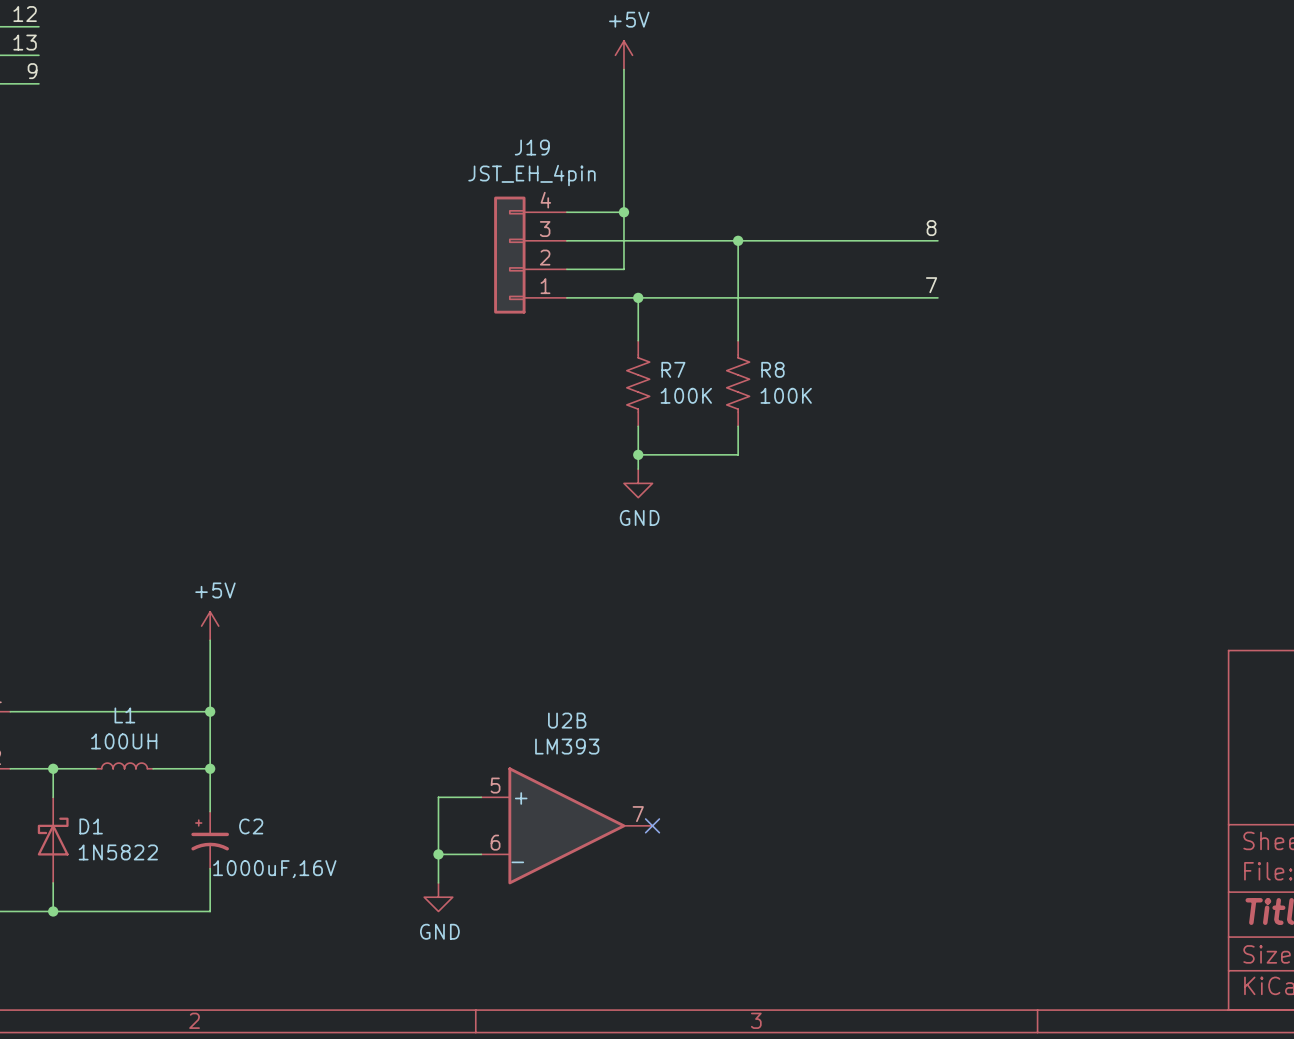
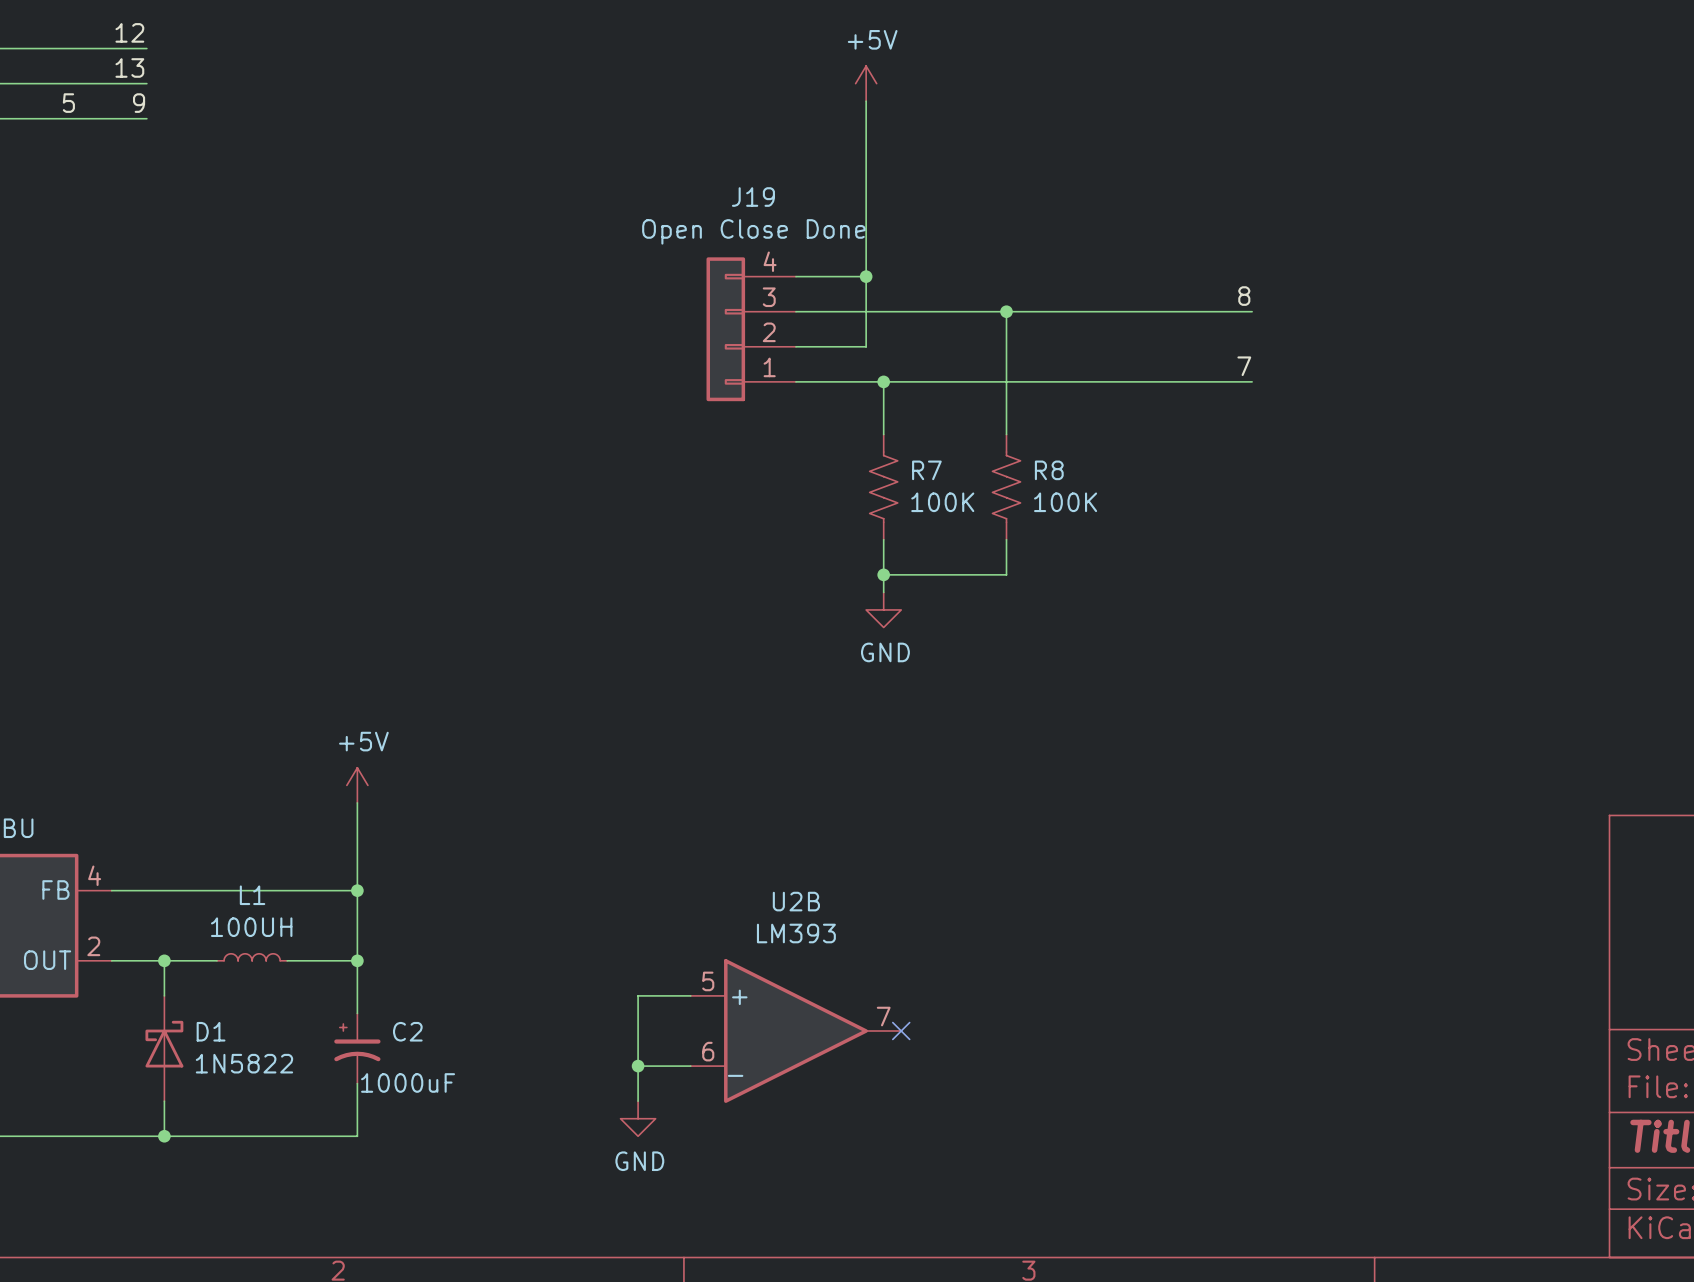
J19 value: JST_EH_4pin (531, 175) -> Open Close Done (753, 231)
C2 value: 1000uF,16V (274, 869) -> 1000uF (408, 1082)

